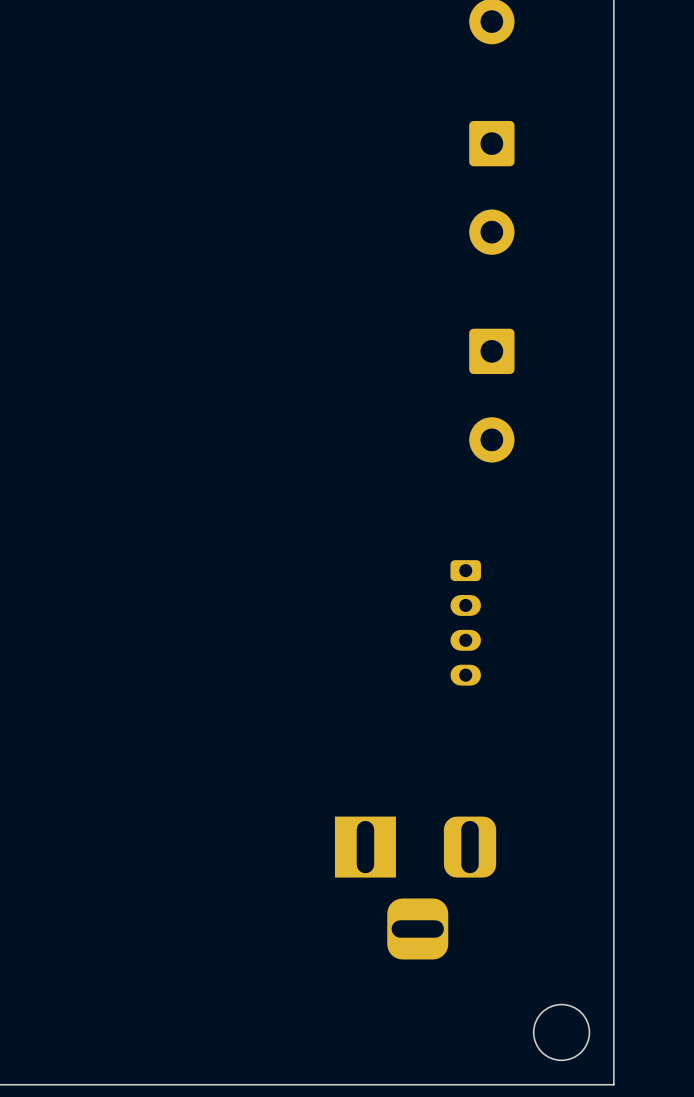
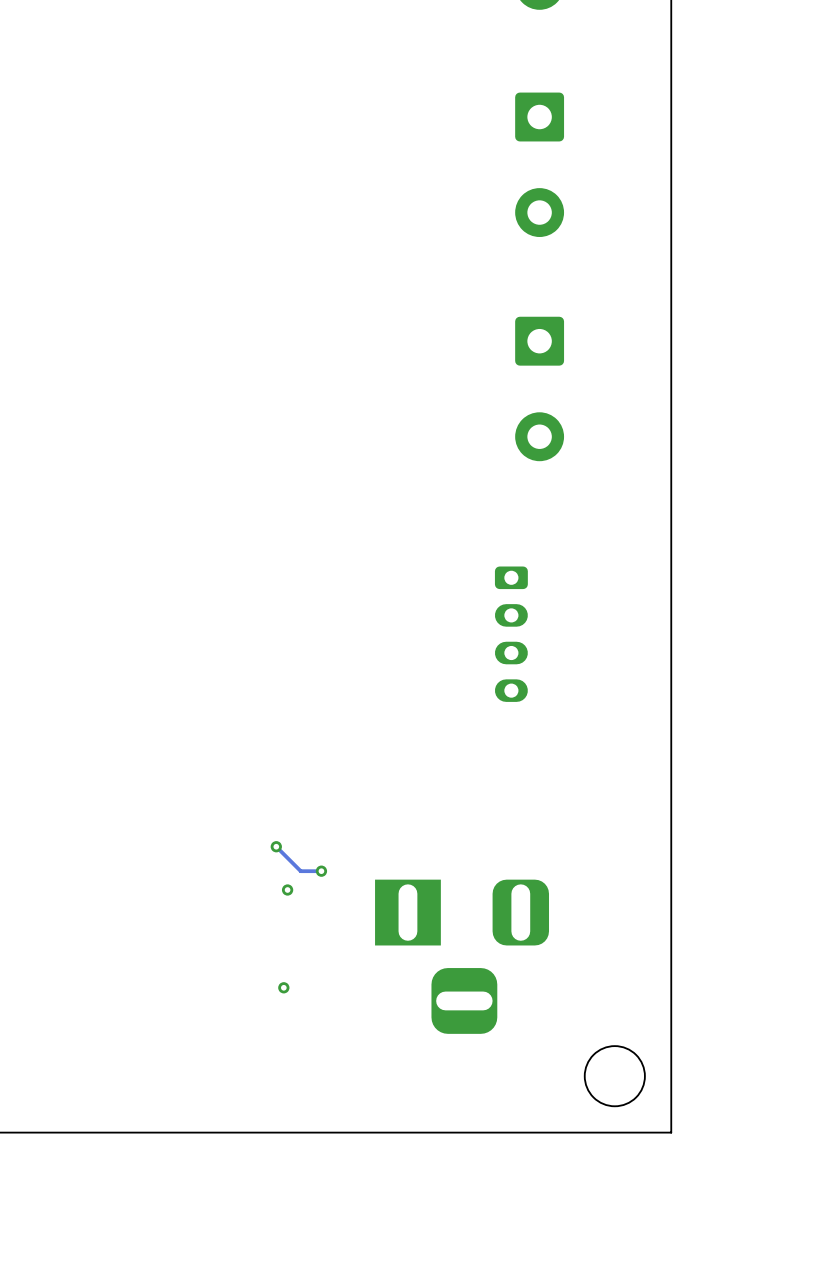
track: none -> (276, 846) (300, 871) (321, 871)
via: none -> (276, 846)
via: none -> (321, 871)
via: none -> (287, 889)
part position: (415, 888) -> (462, 956)
via: none -> (283, 987)

